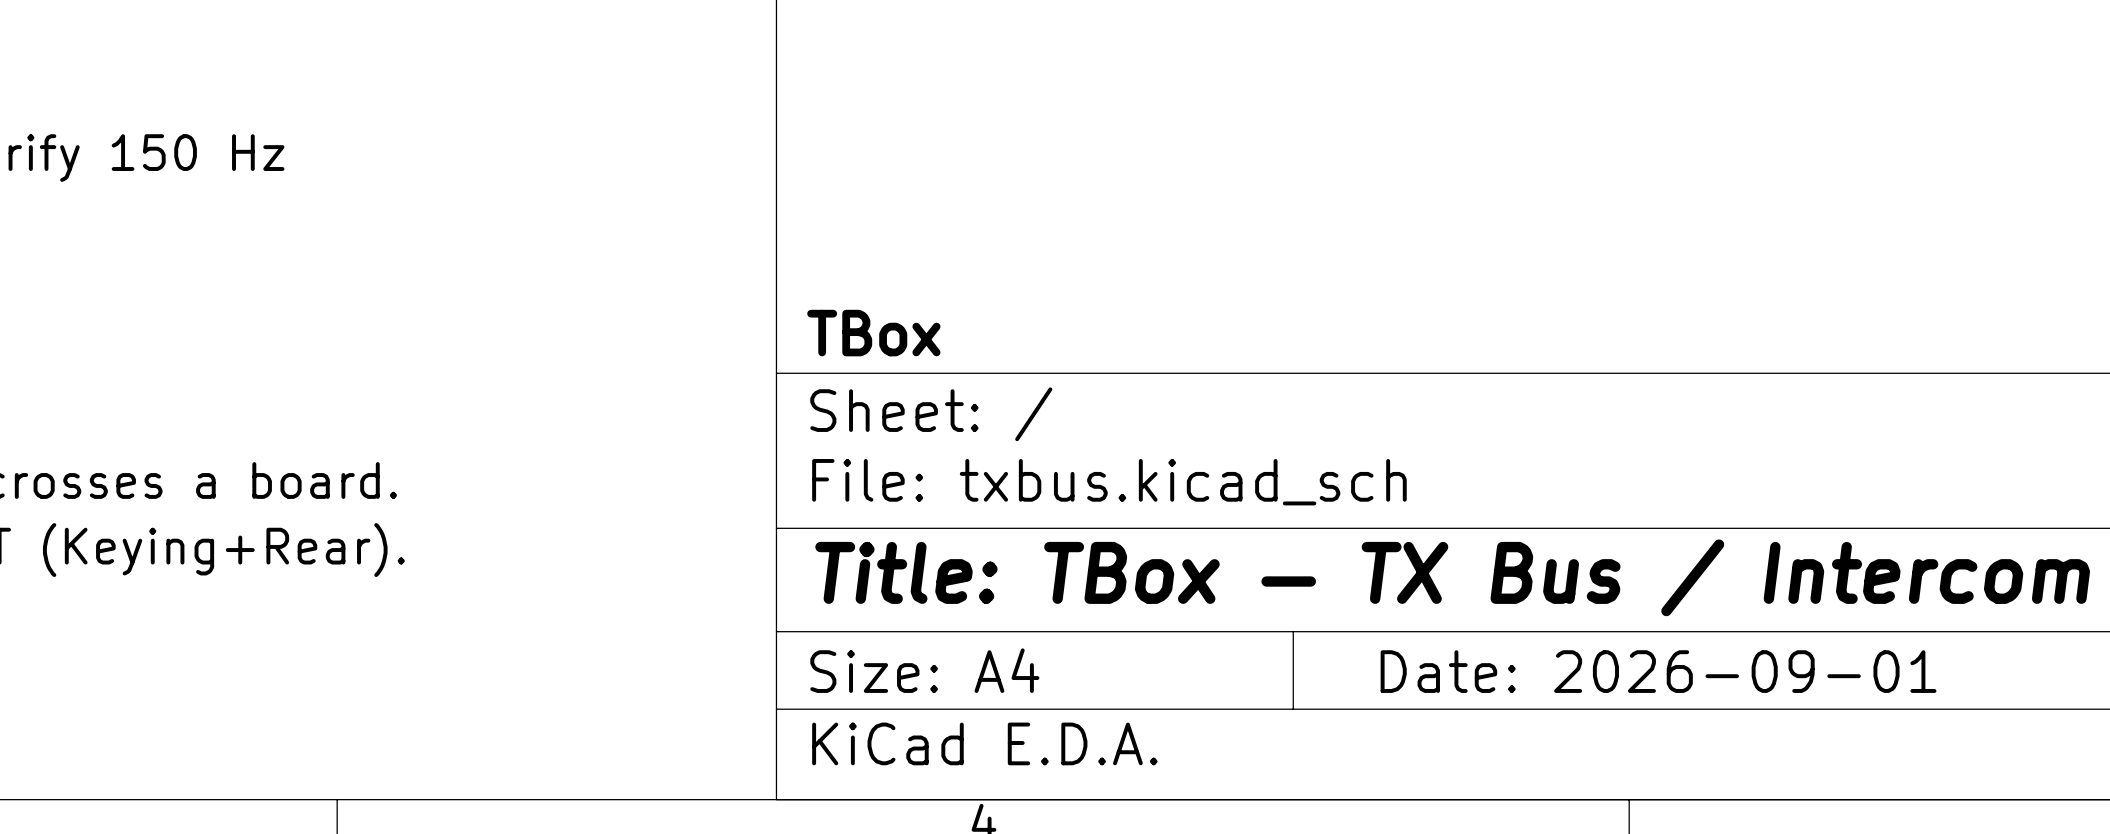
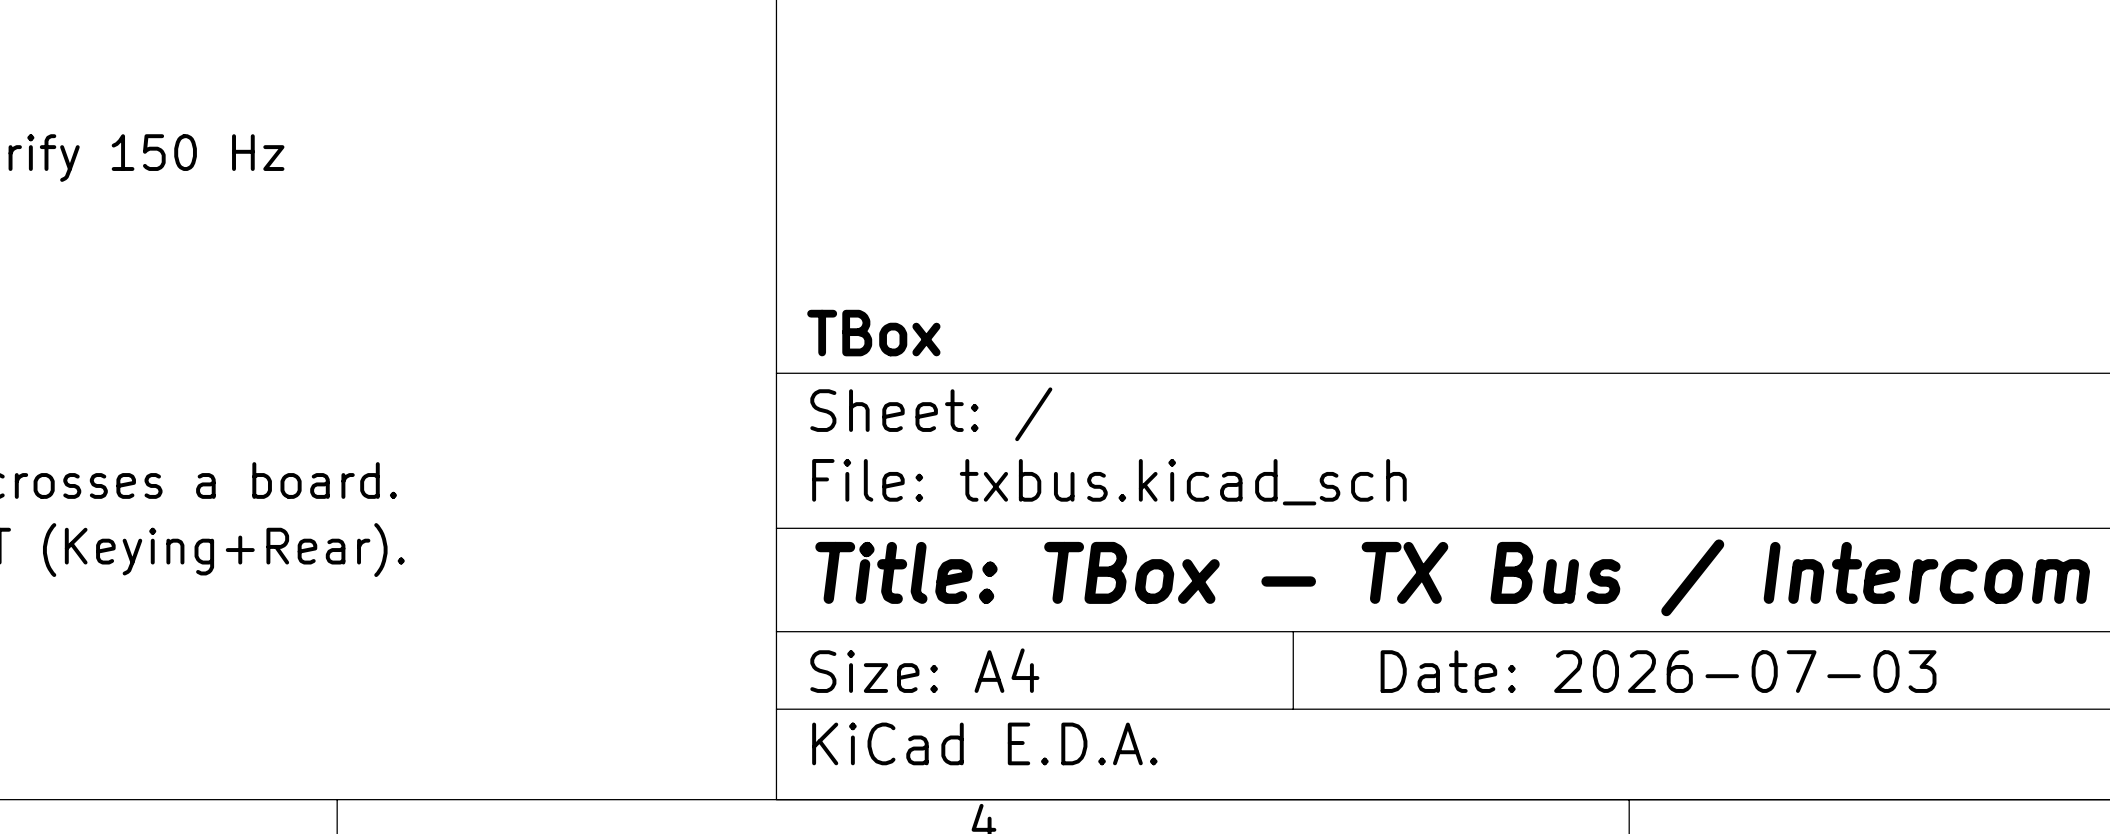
title block: Date: 2026-09-01 (1658, 671) -> Date: 2026-07-03 (1658, 671)

